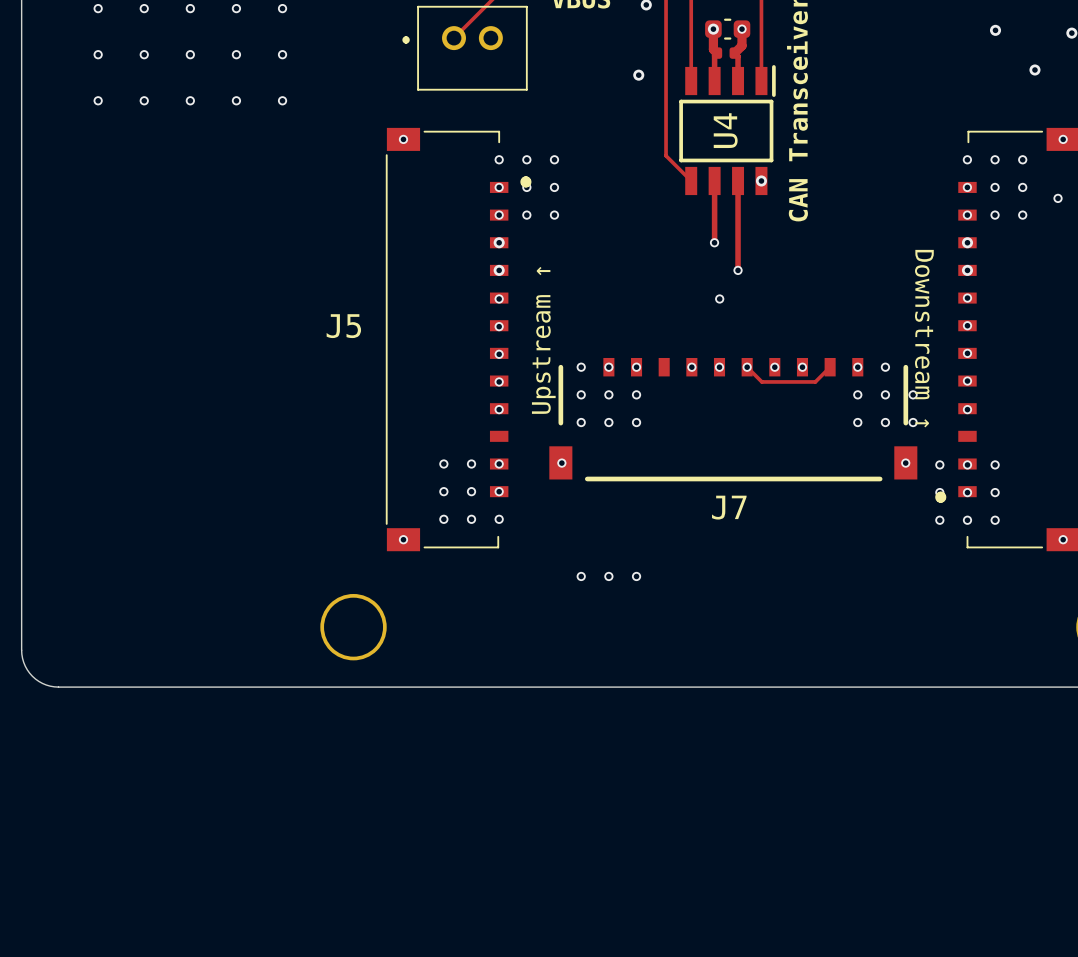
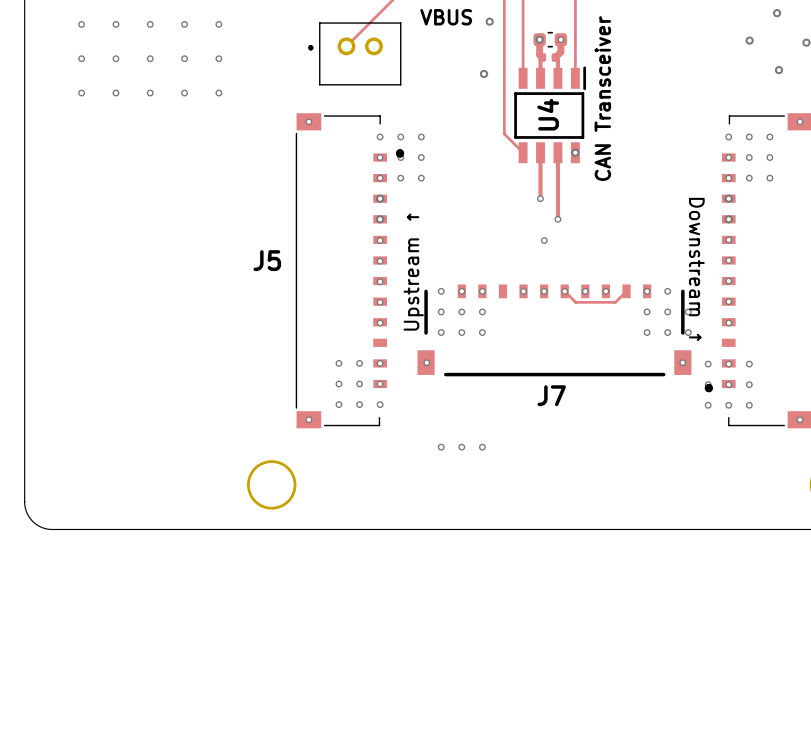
via: (1058, 198) -> none

